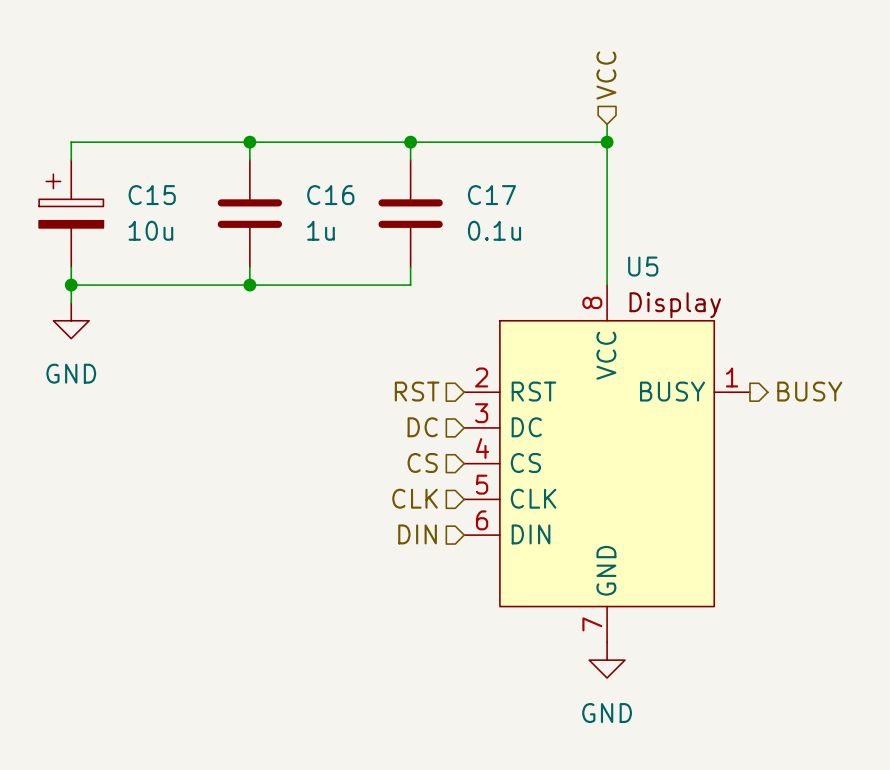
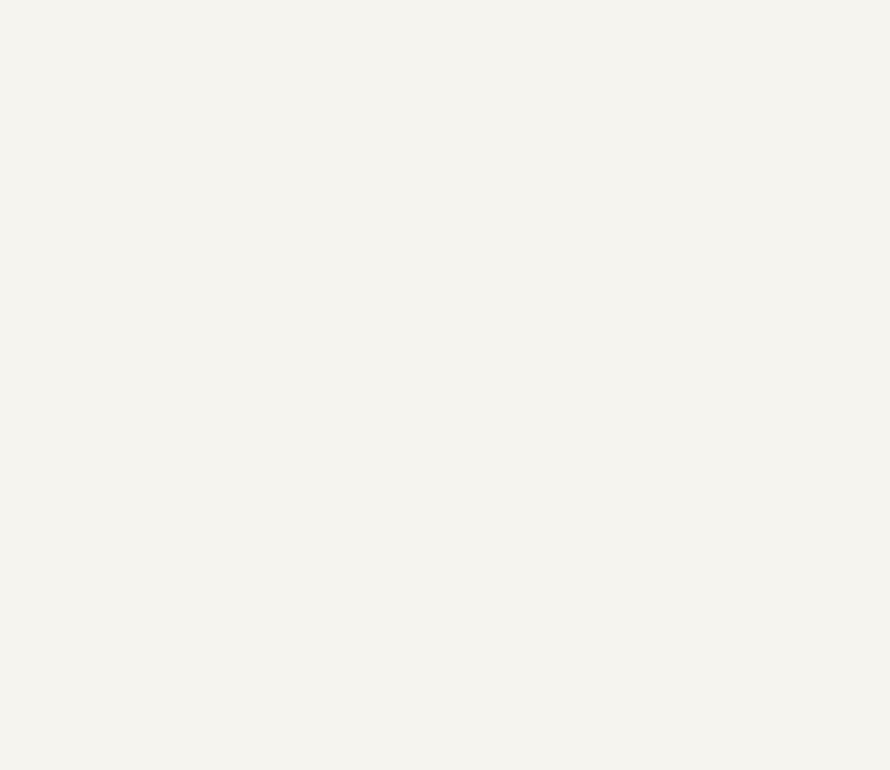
hierarchical label: VCC (606, 75) -> none
wire: (607, 124) (607, 285) -> none
wire: (249, 142) (249, 160) -> none
junction: (249, 142) -> none
wire: (410, 142) (410, 160) -> none
junction: (410, 142) -> none
wire: (607, 142) (71, 142) (71, 160) -> none
junction: (607, 142) -> none
C15: 10u (71, 213) -> none
C16: 1u (249, 213) -> none
C17: 0.1u (410, 213) -> none
wire: (71, 267) (71, 302) -> none
wire: (249, 267) (249, 285) -> none
wire: (410, 267) (410, 285) (71, 285) -> none
junction: (71, 285) -> none
junction: (249, 285) -> none
power symbol: GND (71, 320) -> none
hierarchical label: RST (417, 391) -> none
hierarchical label: BUSY (809, 391) -> none
hierarchical label: DC (422, 427) -> none
hierarchical label: CS (422, 462) -> none
U5: (607, 463) -> none
hierarchical label: CLK (415, 498) -> none
hierarchical label: DIN (417, 534) -> none
power symbol: GND (607, 660) -> none

